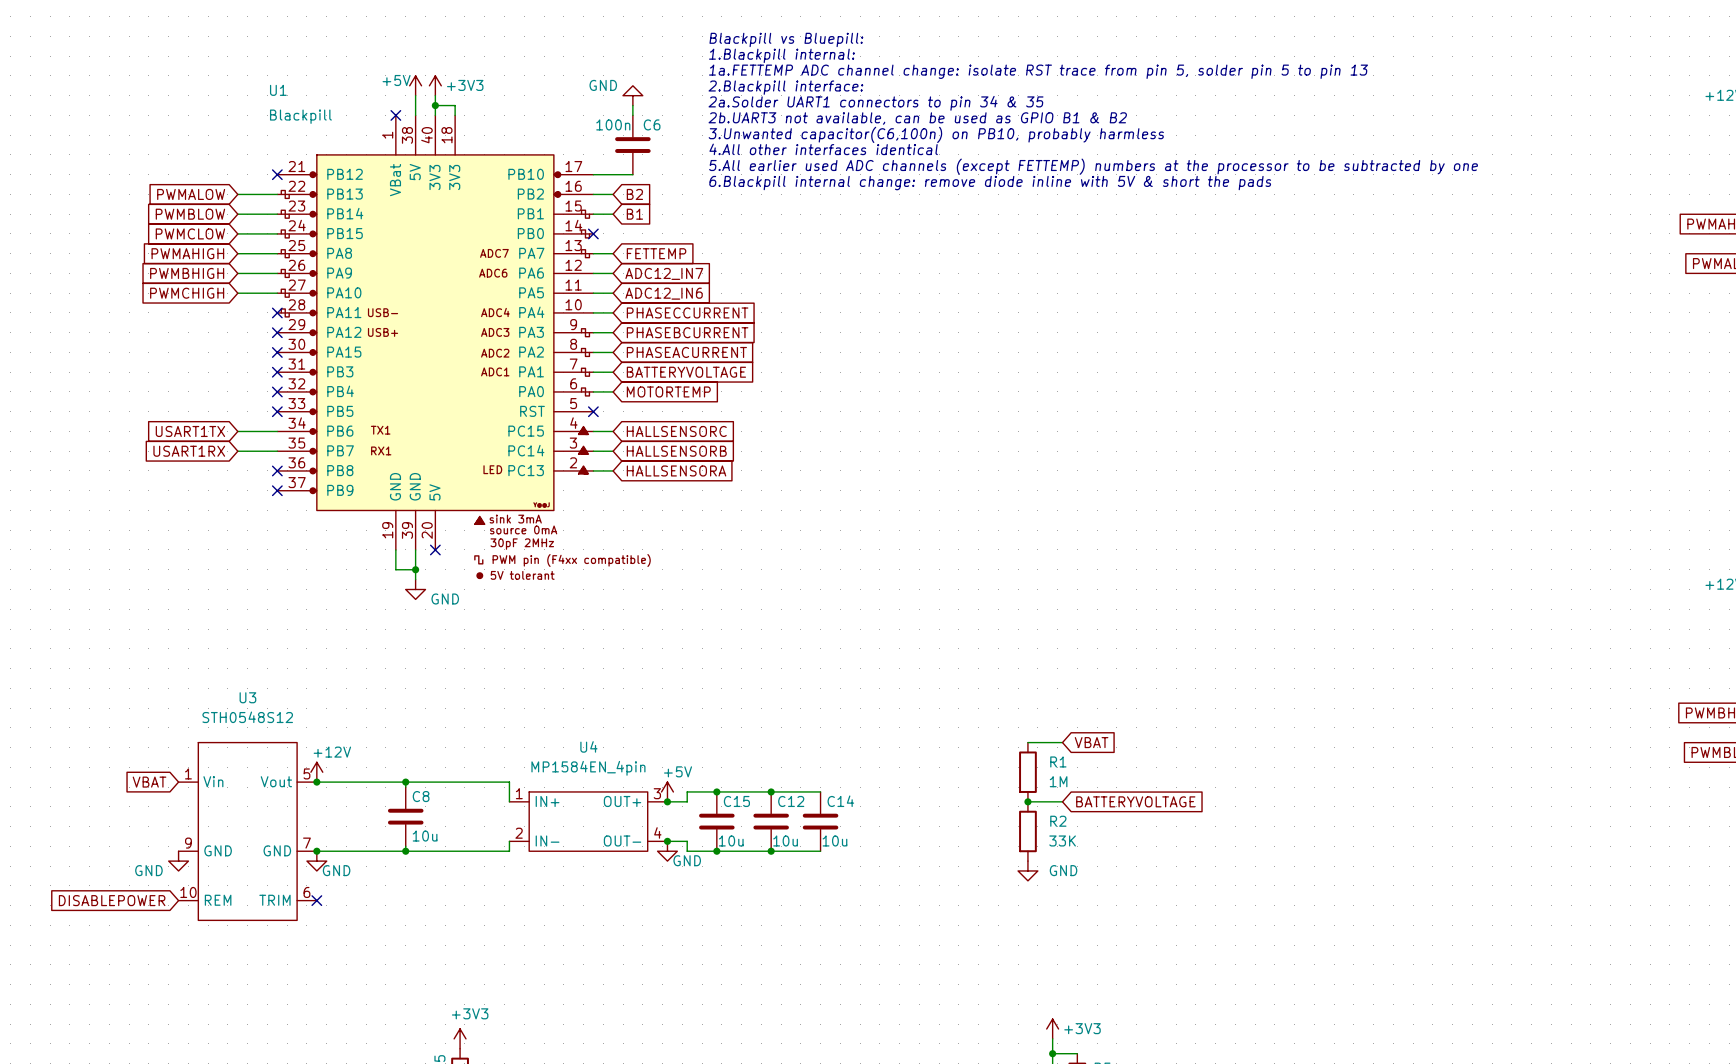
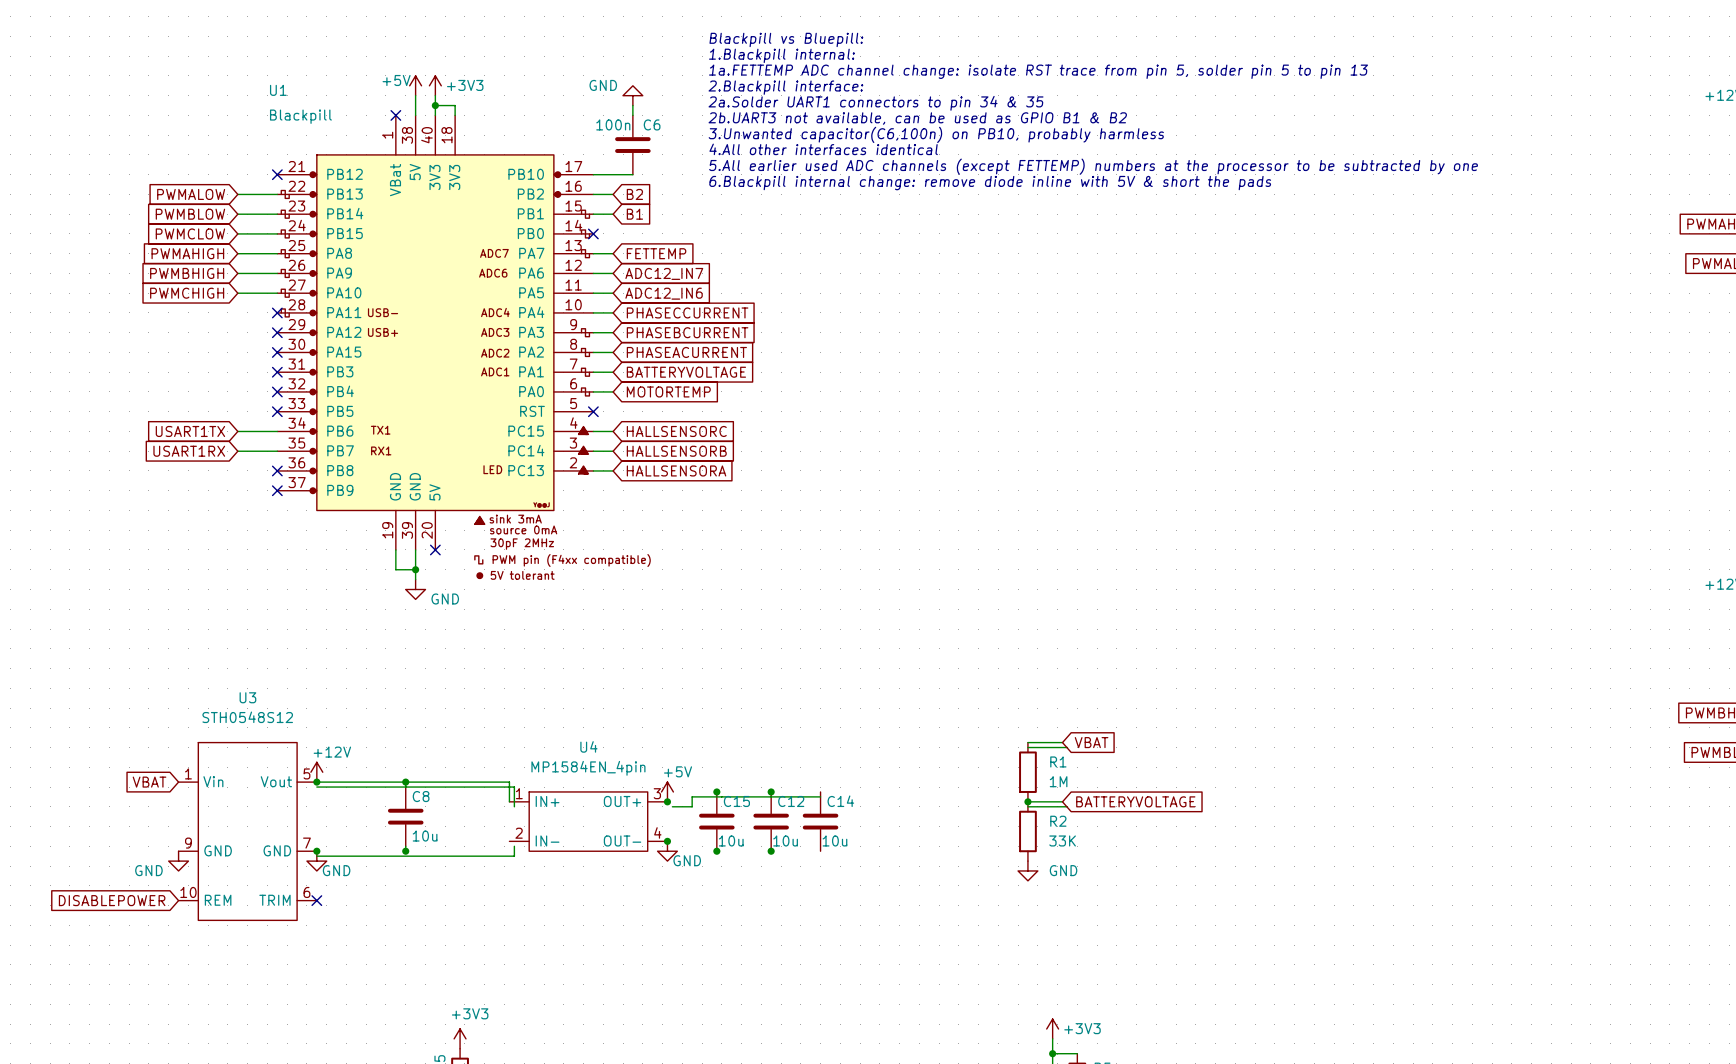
wire: none -> (1027, 747) (1067, 747)
wire: none -> (316, 787) (514, 787) (514, 806)
wire: (820, 791) (687, 791) (687, 801) (667, 801) -> none
wire: none -> (820, 796) (692, 796) (692, 806) (672, 806)
wire: none -> (1027, 806) (1067, 806)
wire: (509, 841) (509, 851) (316, 851) -> none
wire: (667, 841) (687, 841) (687, 851) (820, 851) -> none
wire: none -> (514, 846) (514, 856) (316, 856)

